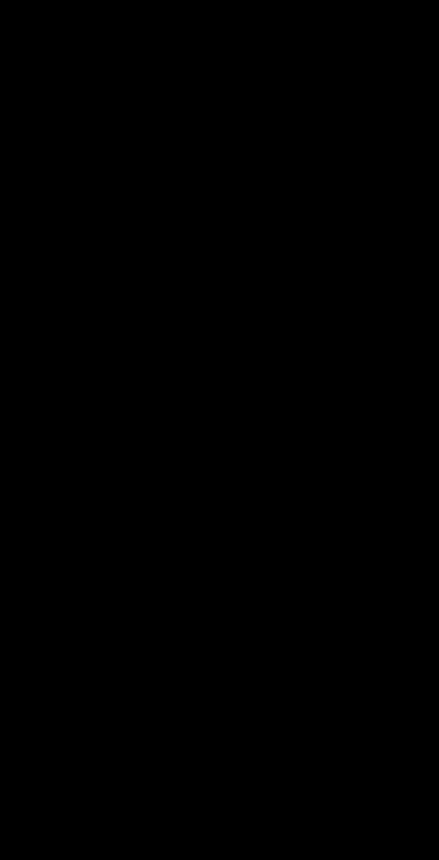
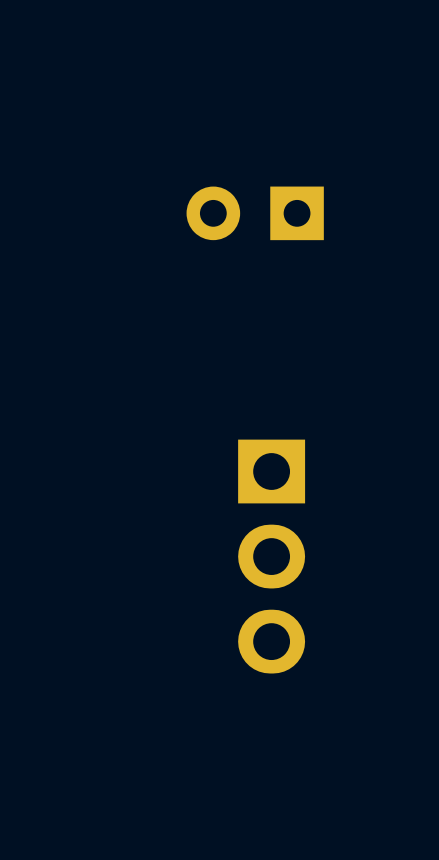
part: none -> (255, 213)
part: none -> (271, 556)

